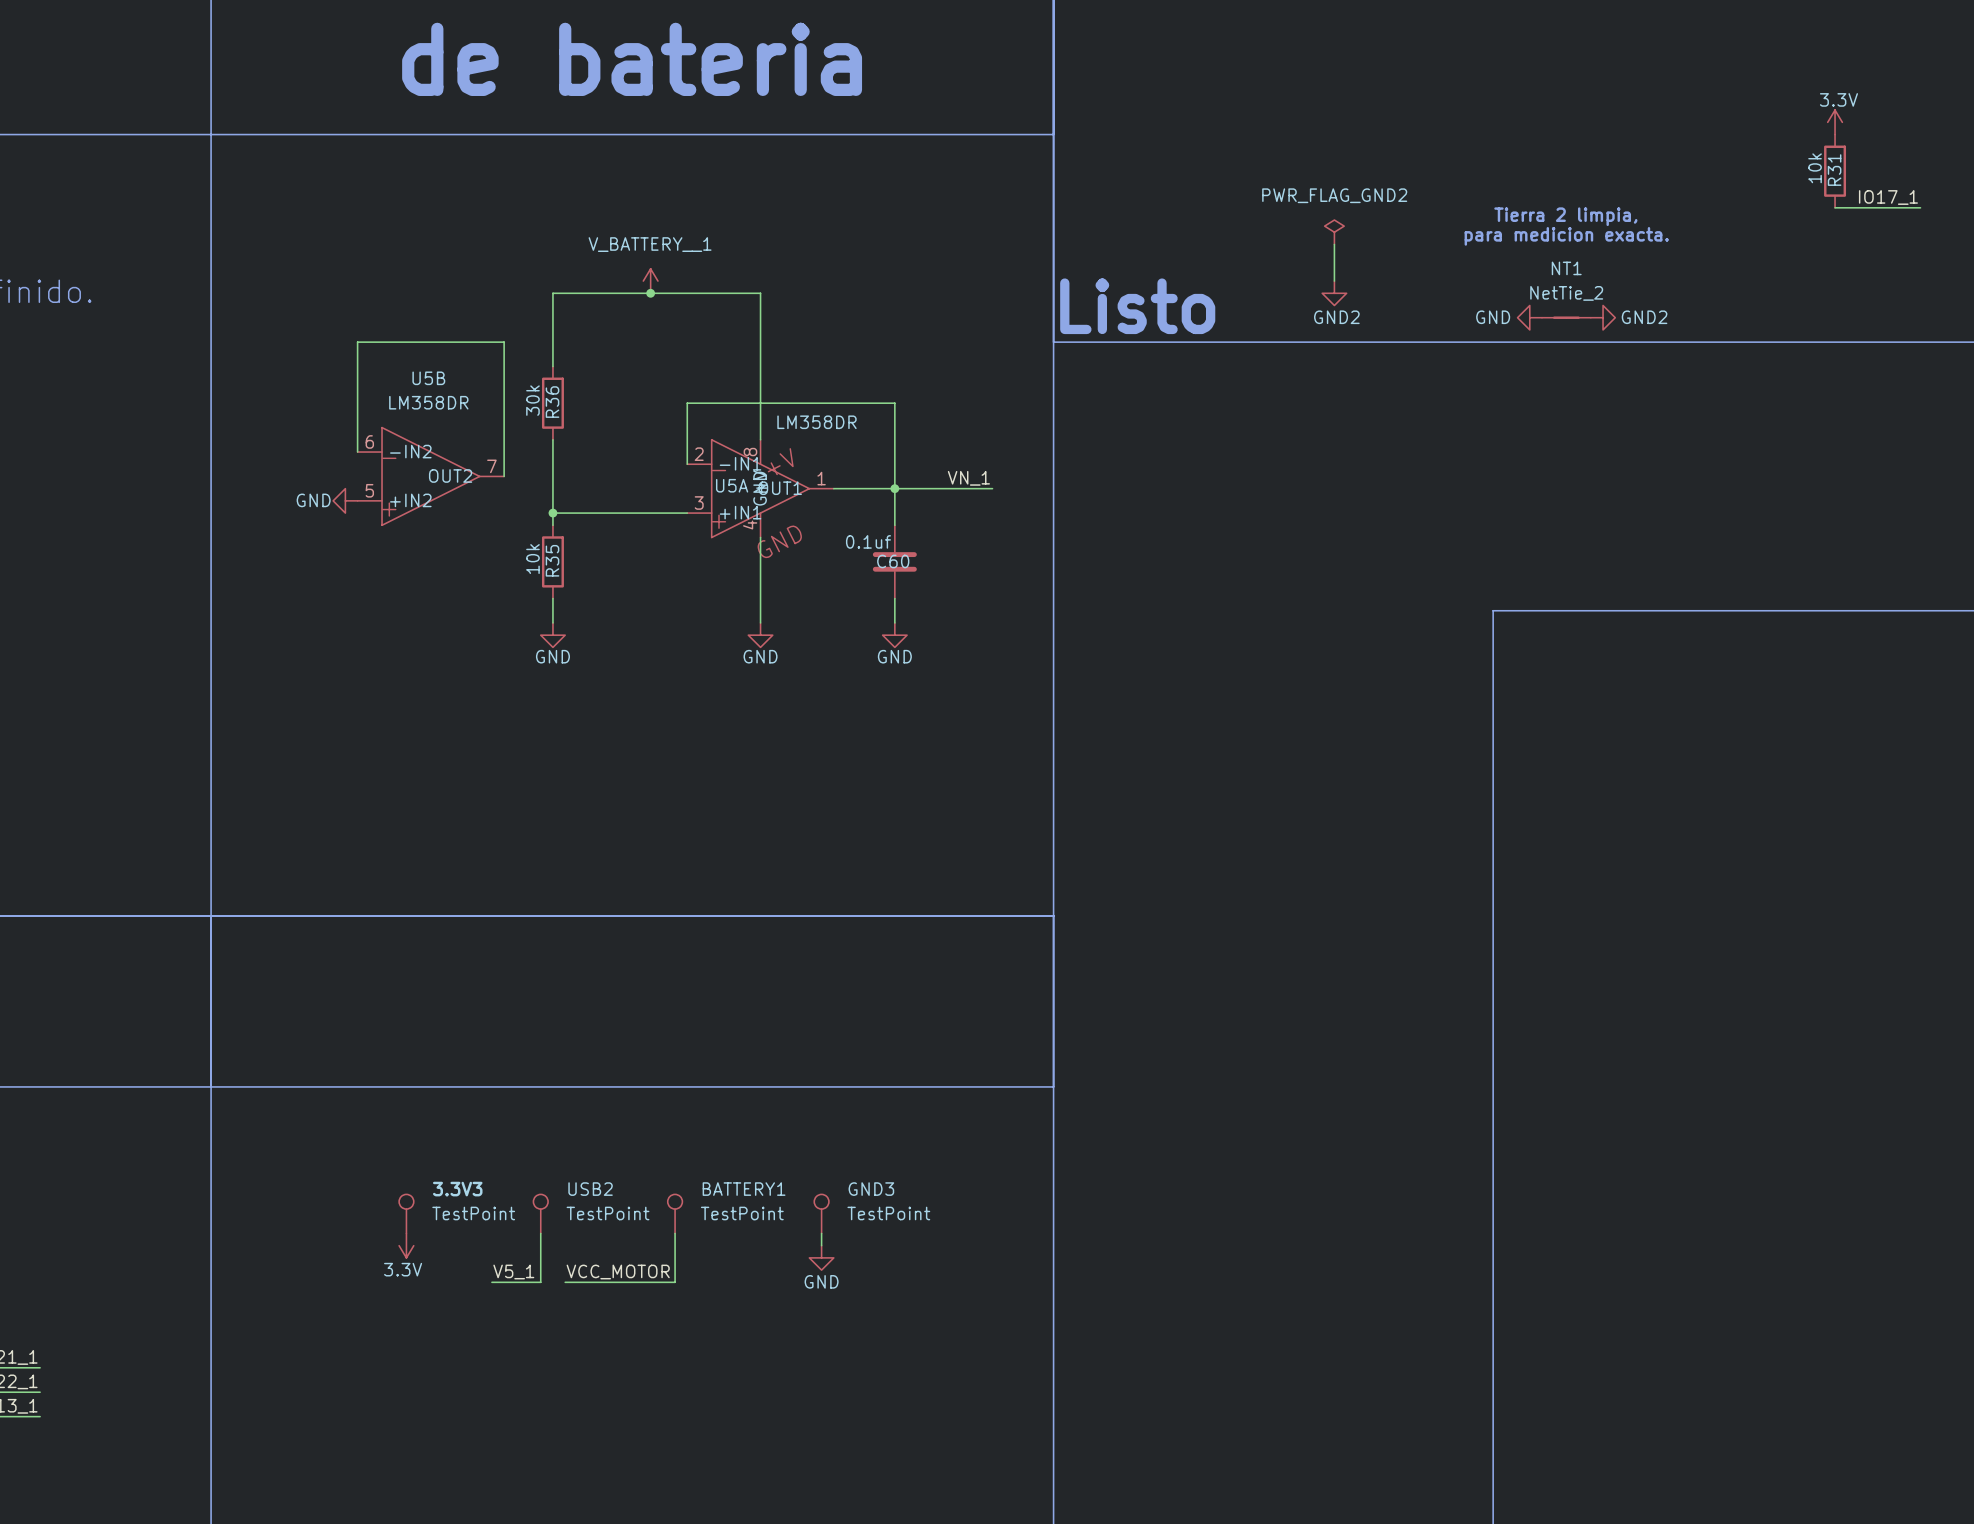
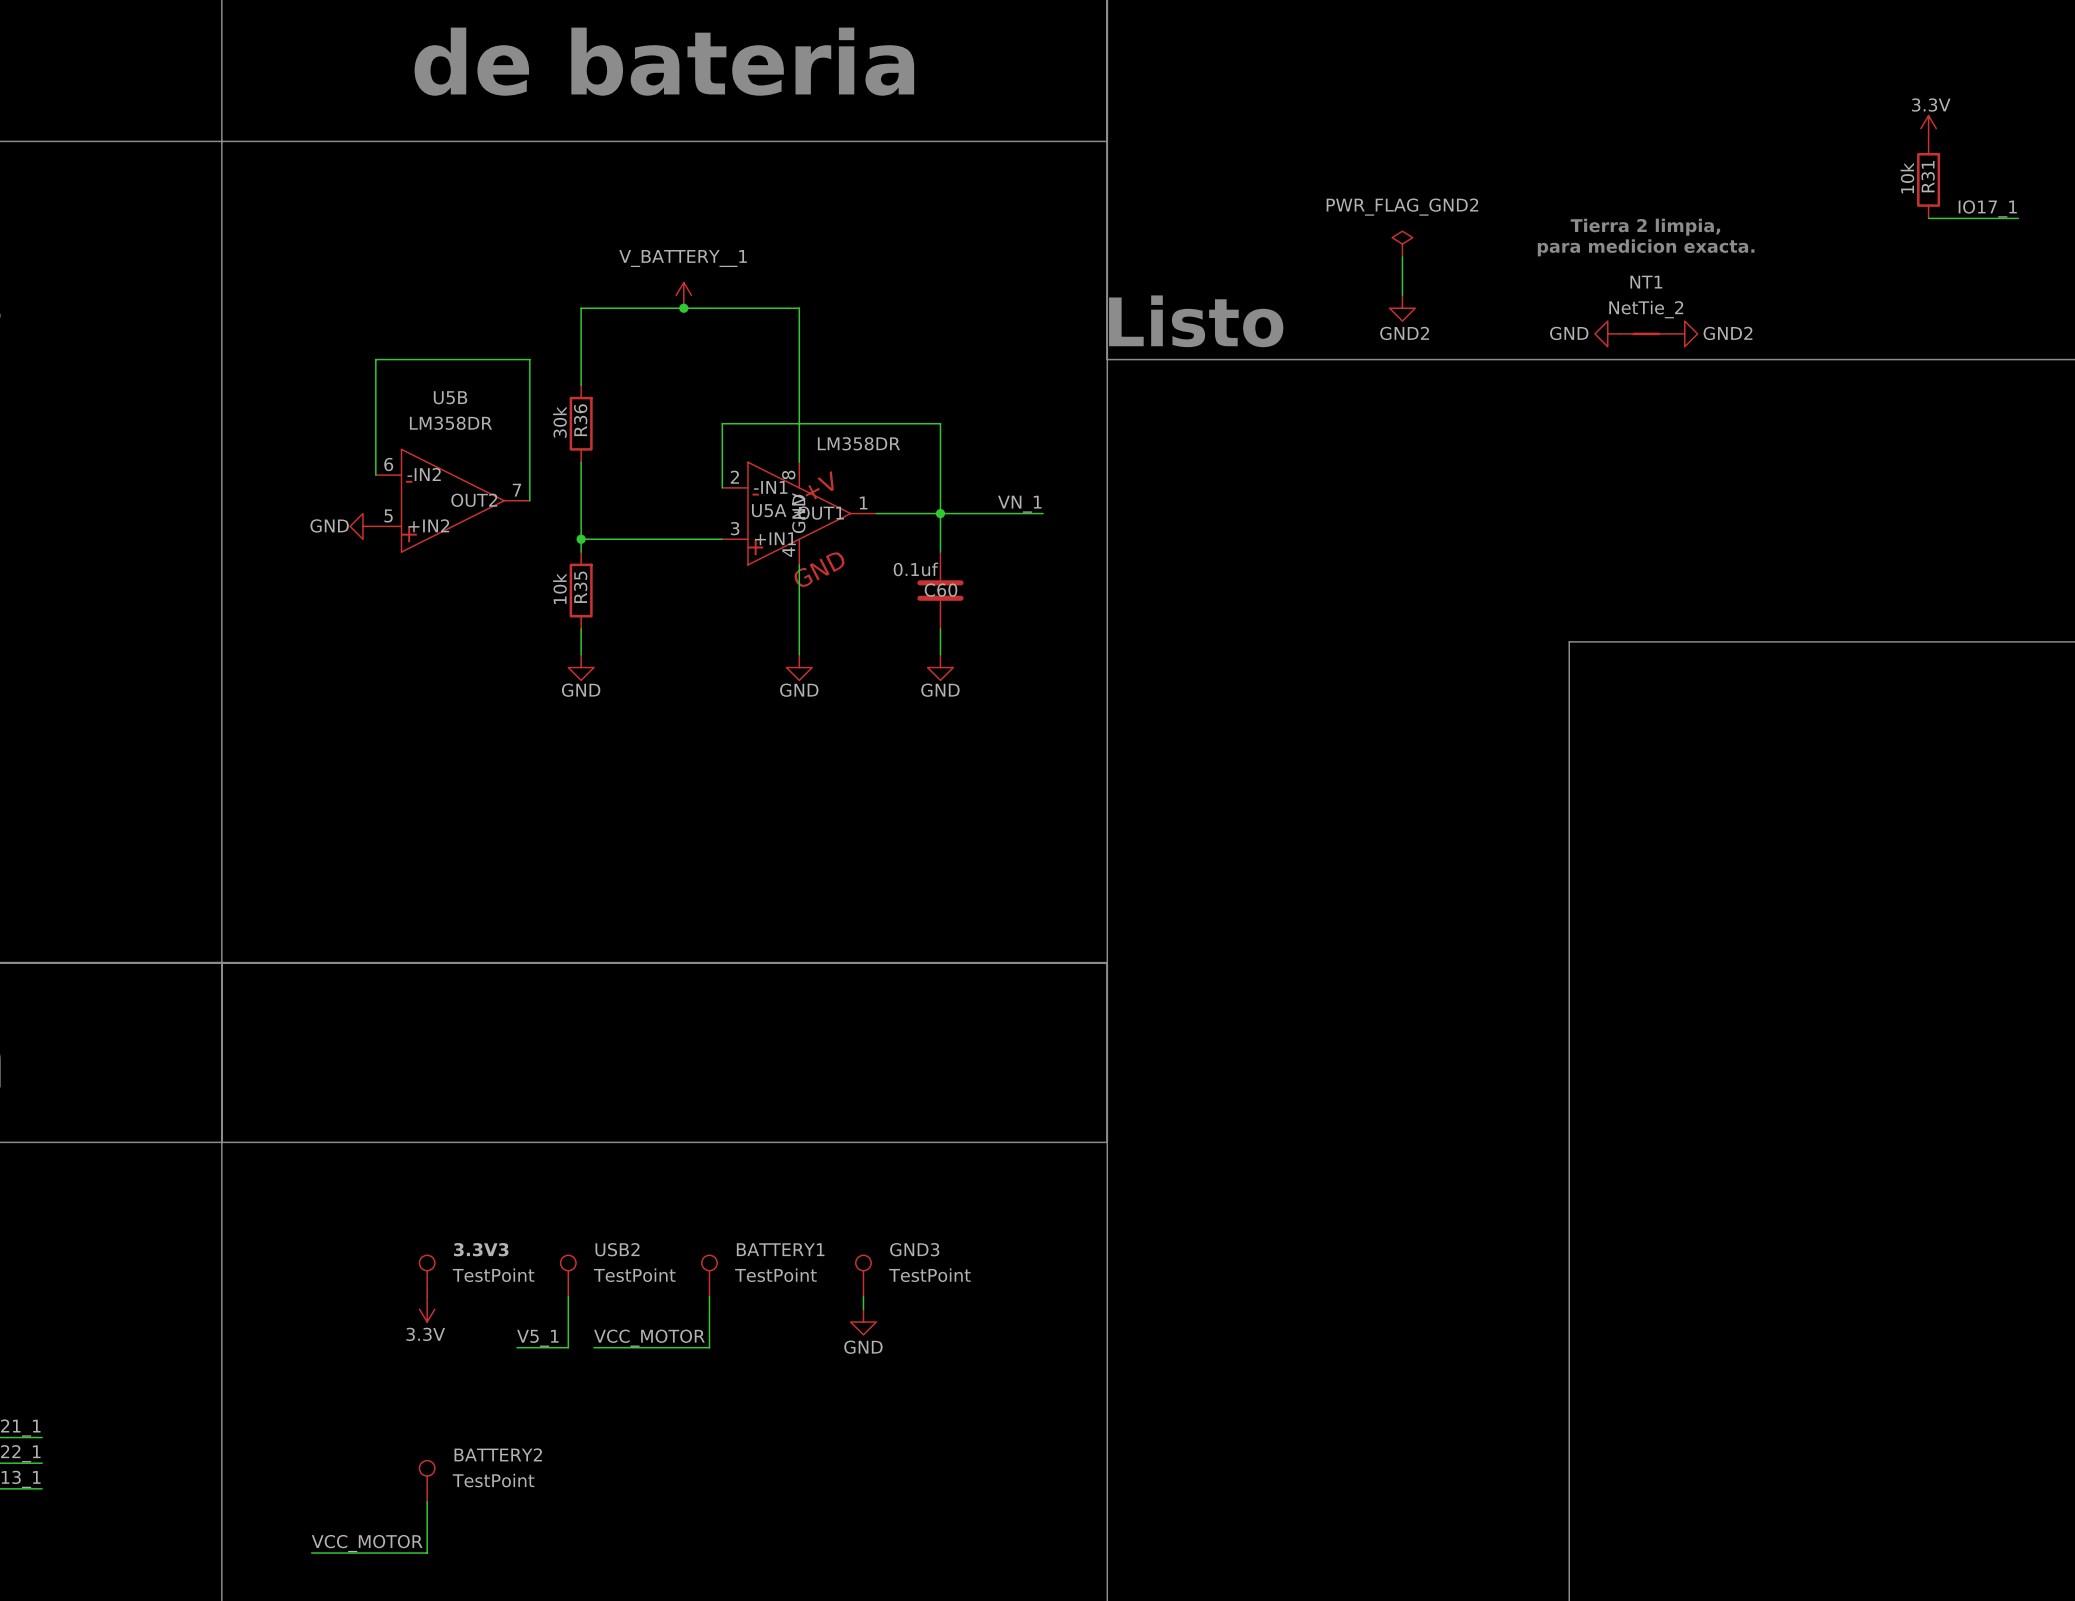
BATTERY2: none -> TestPoint (427, 1481)
wire: none -> (427, 1501) (427, 1553) (311, 1553)
label: none -> VCC_MOTOR (367, 1543)

